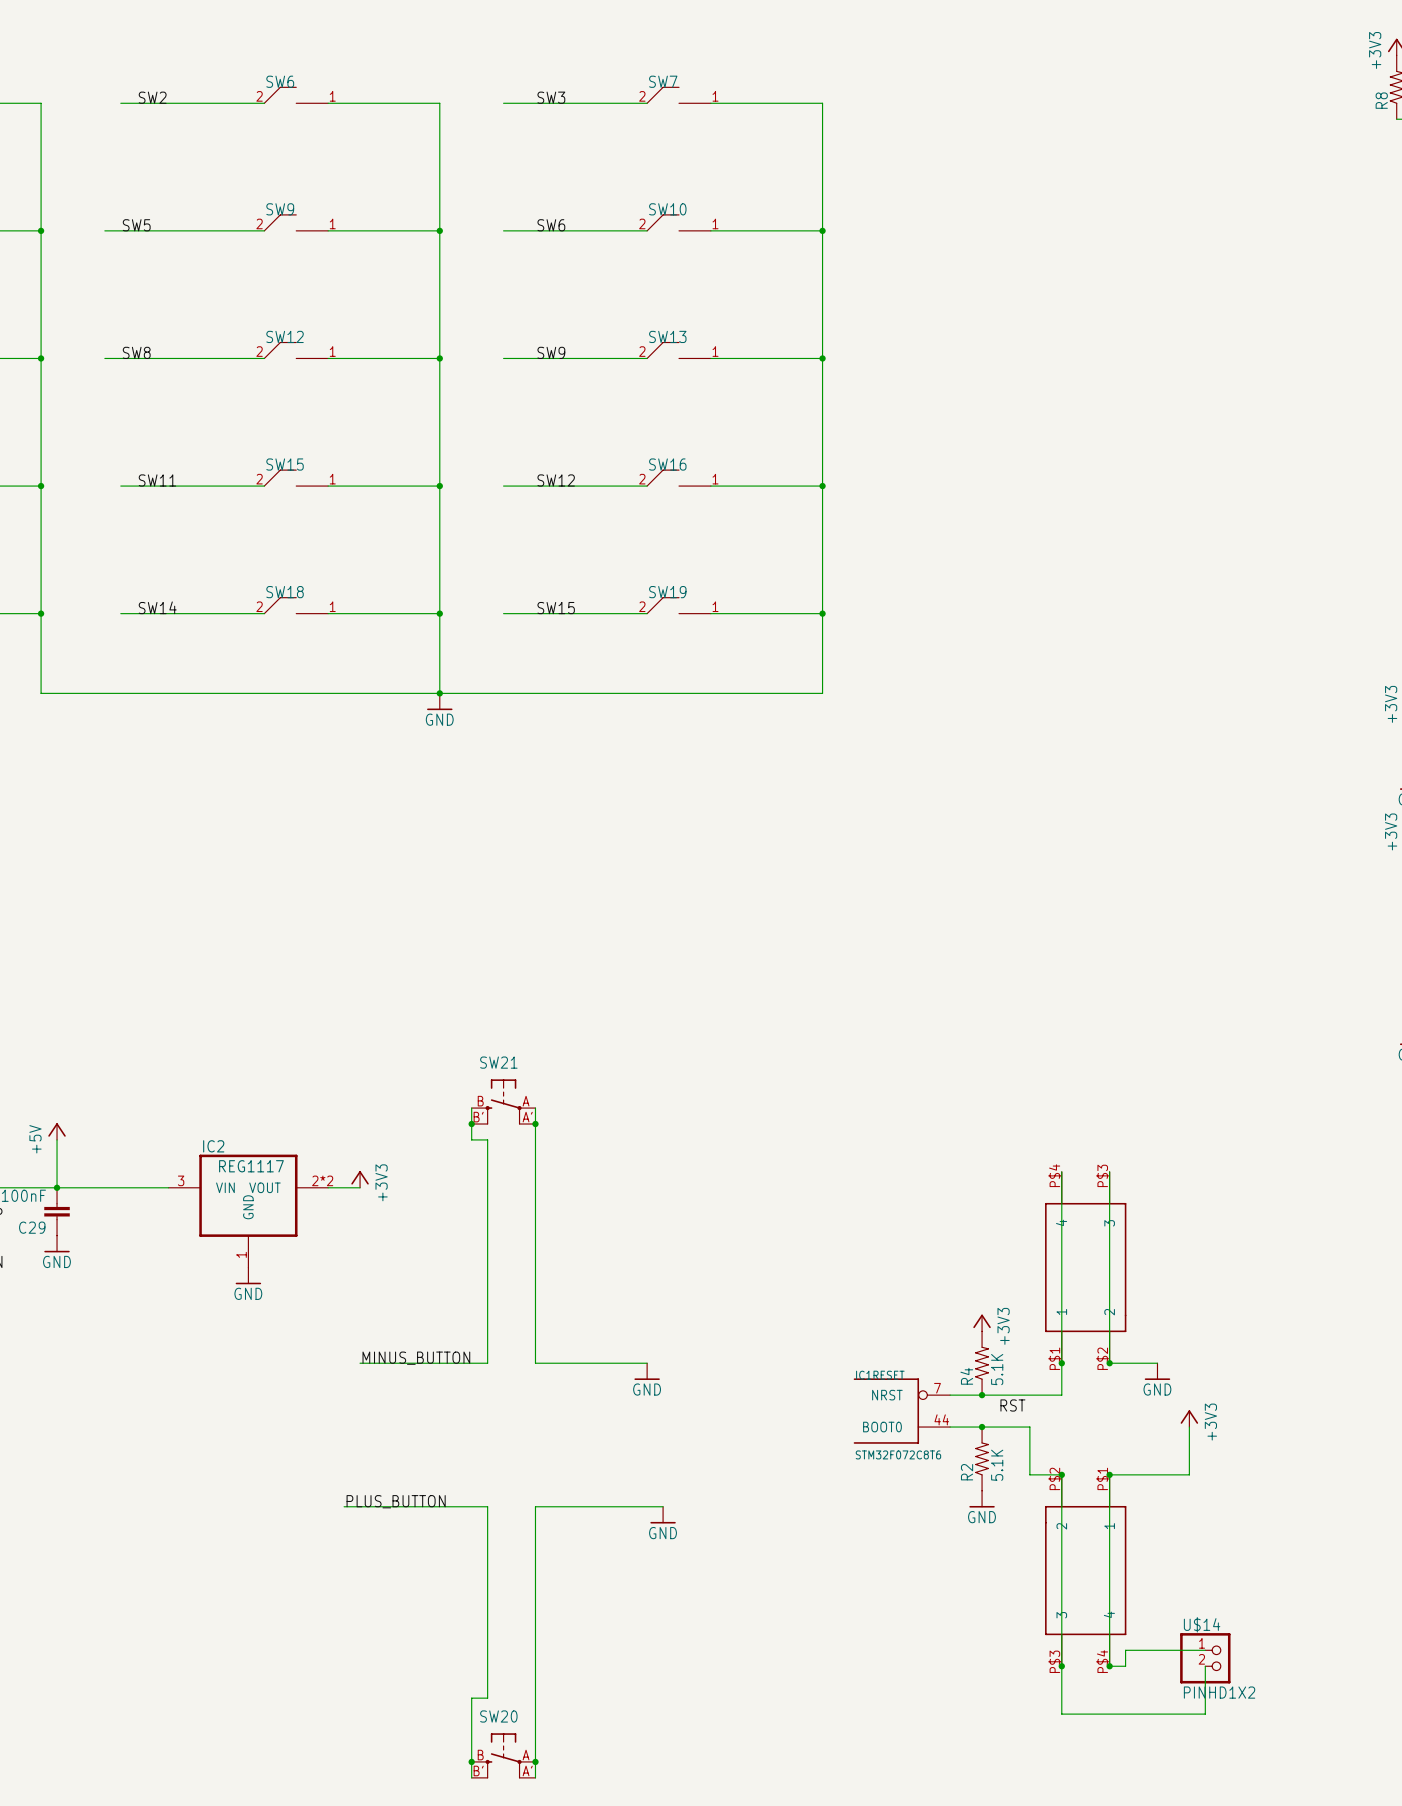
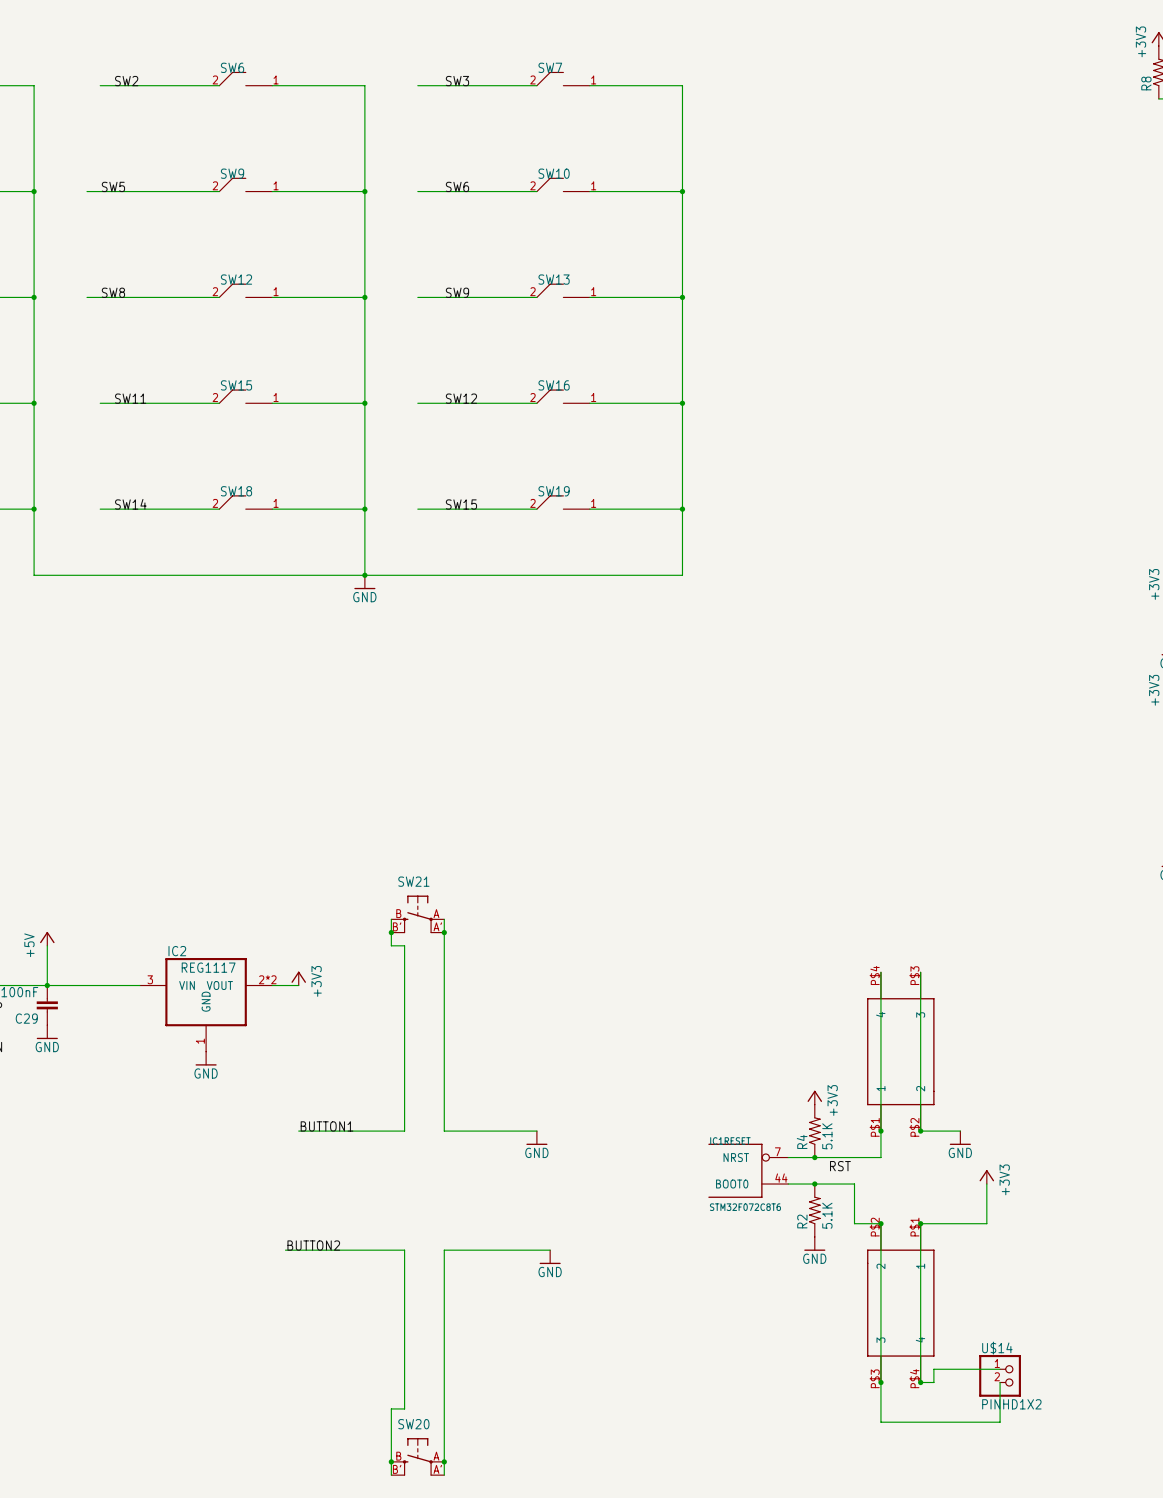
label: MINUS_BUTTON (416, 1358) -> BUTTON1 (327, 1126)
label: PLUS_BUTTON (396, 1501) -> BUTTON2 (313, 1245)

